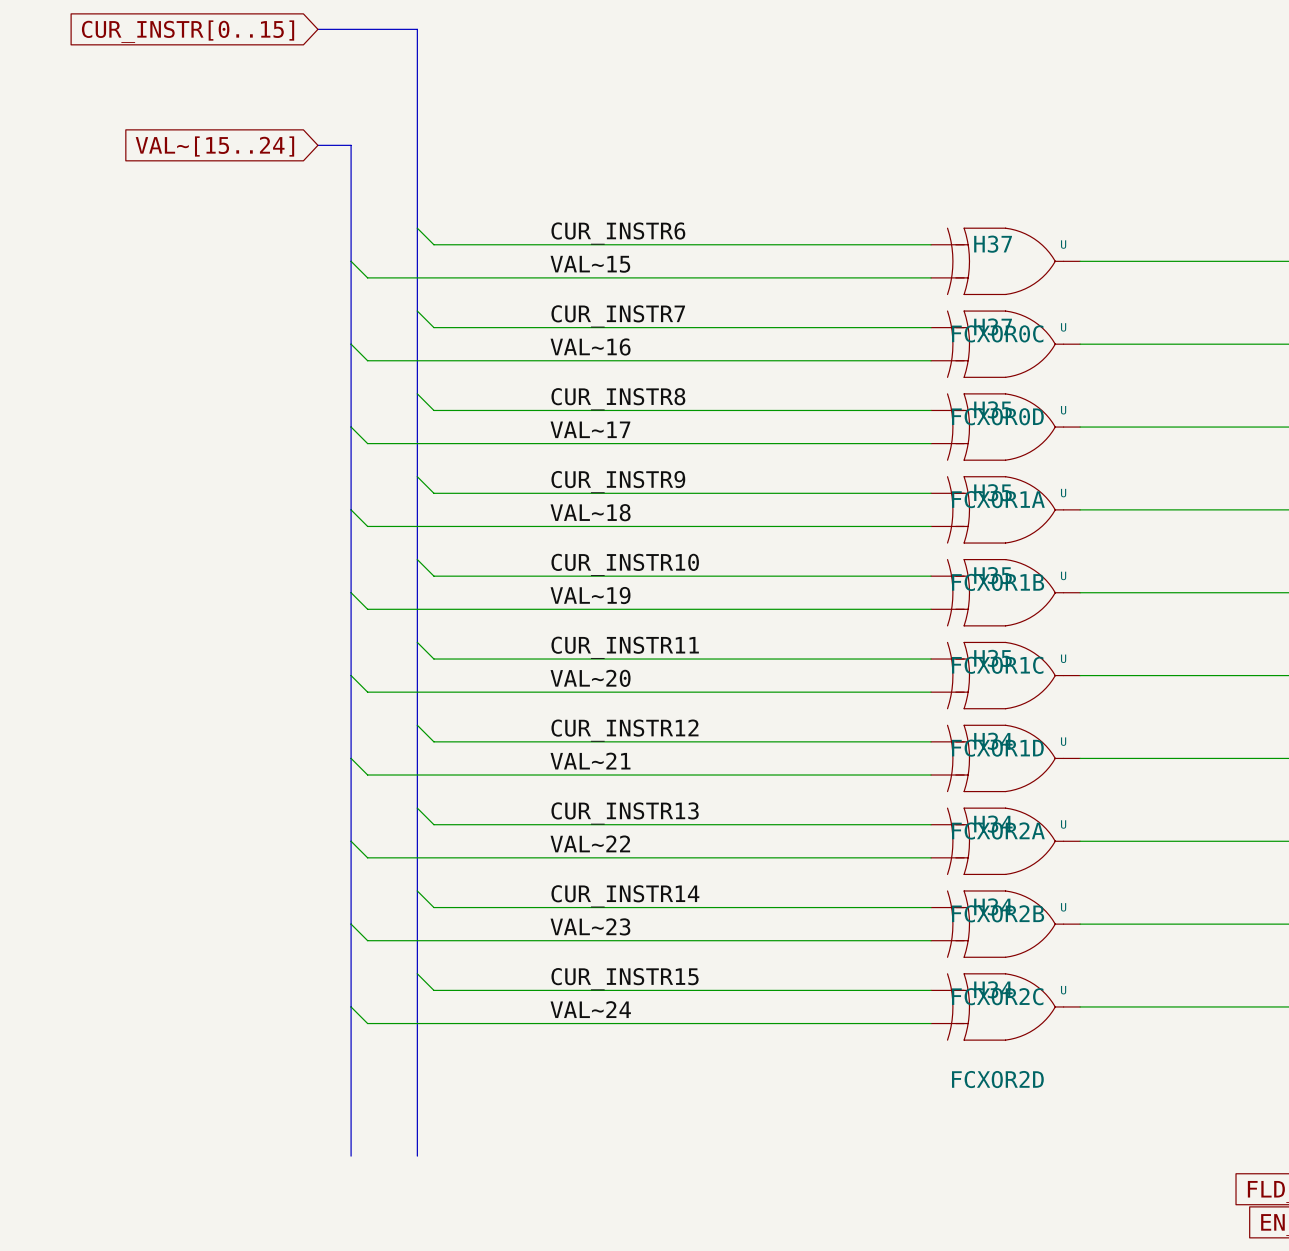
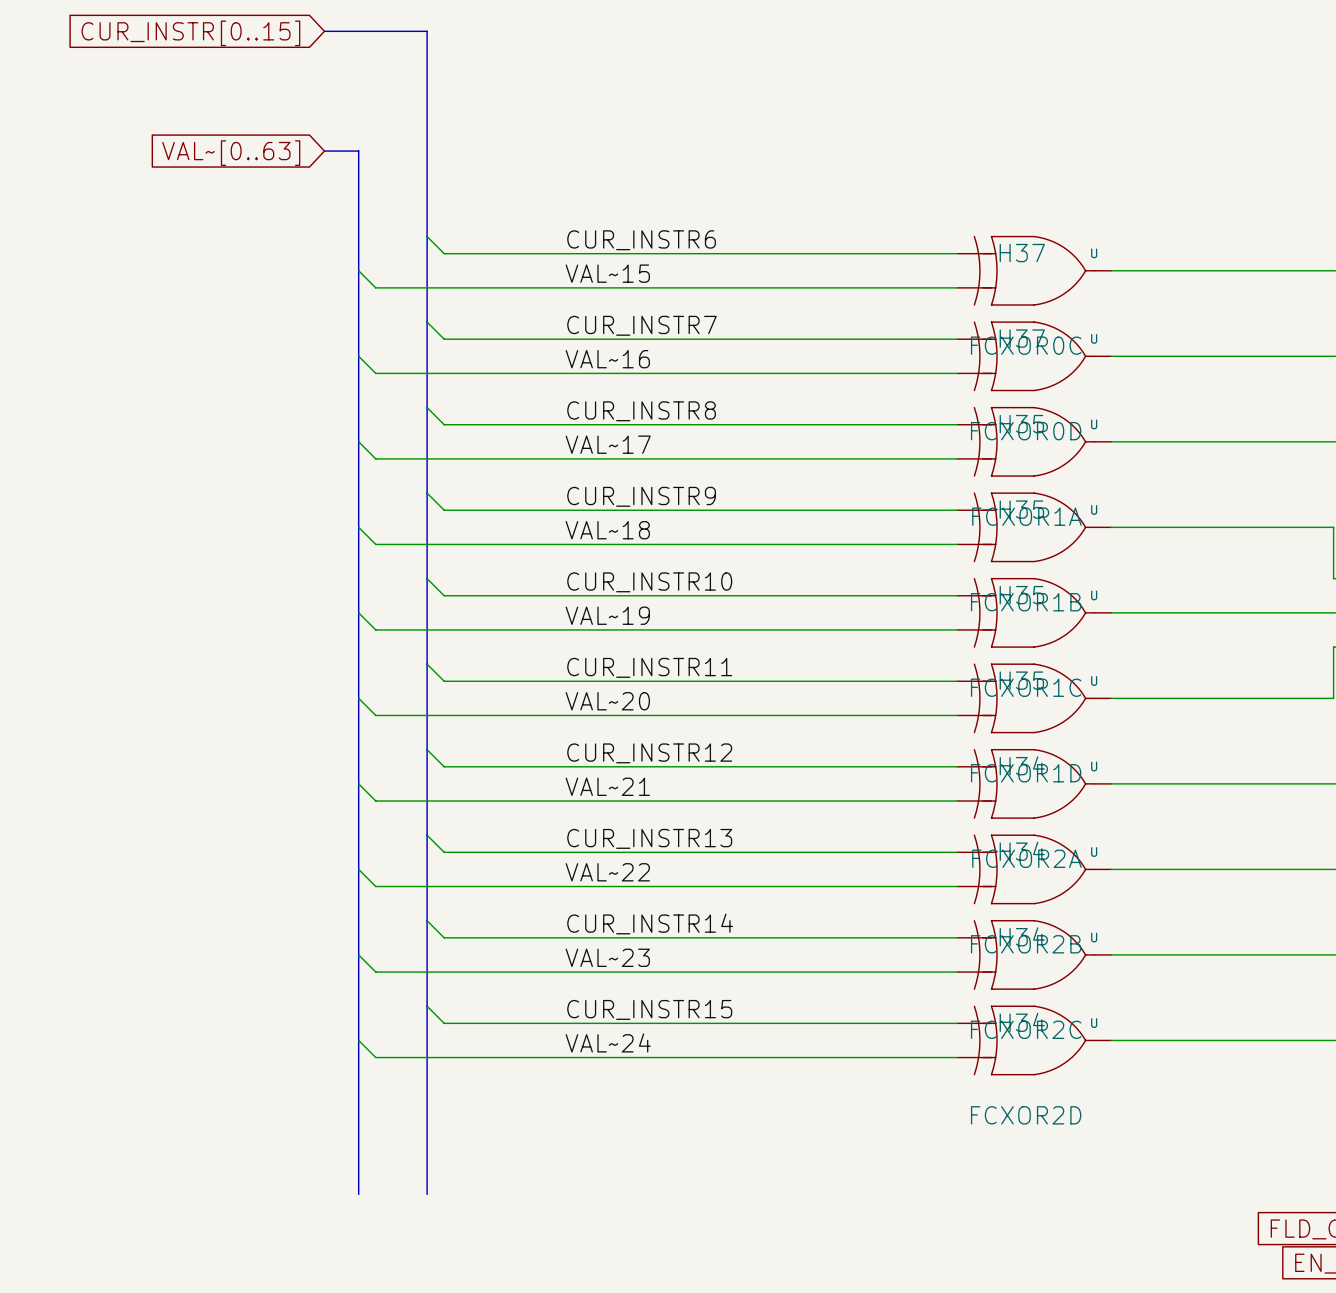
global label: VAL~[15..24] (214, 146) -> VAL~[0..63] (231, 153)

